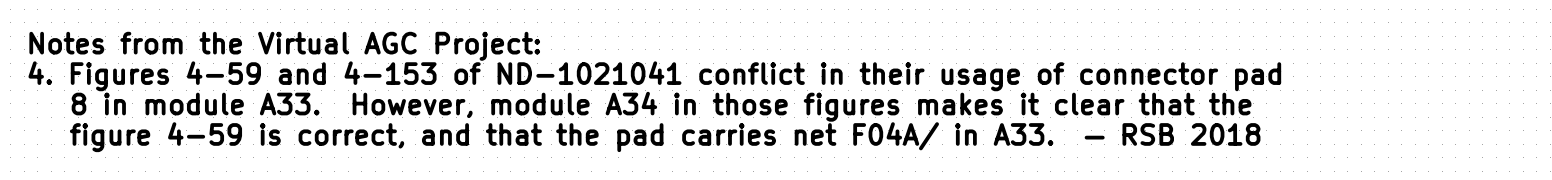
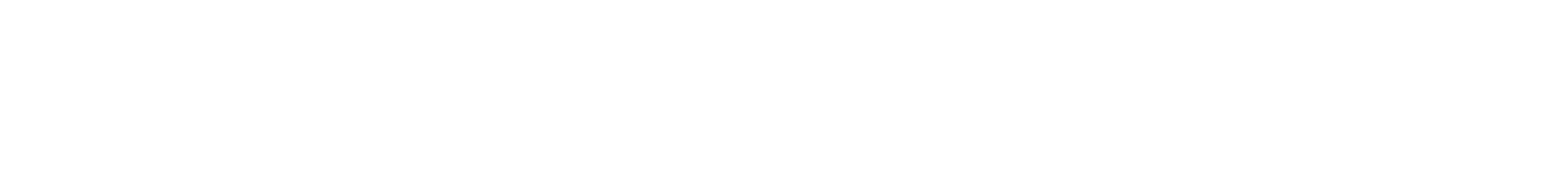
text: Notes from the Virtual AGC Project: (284, 46) -> none
text: 4. Figures 4-59 and 4-153 of ND-1021041 conflict in their usage of connector pad (654, 76) -> none
text: 8 in module A33. However, module A34 in those figures makes it clear that the (661, 106) -> none
text: figure 4-59 is correct, and that the pad carries net F04A/ in A33. — RSB 2018 (665, 137) -> none

